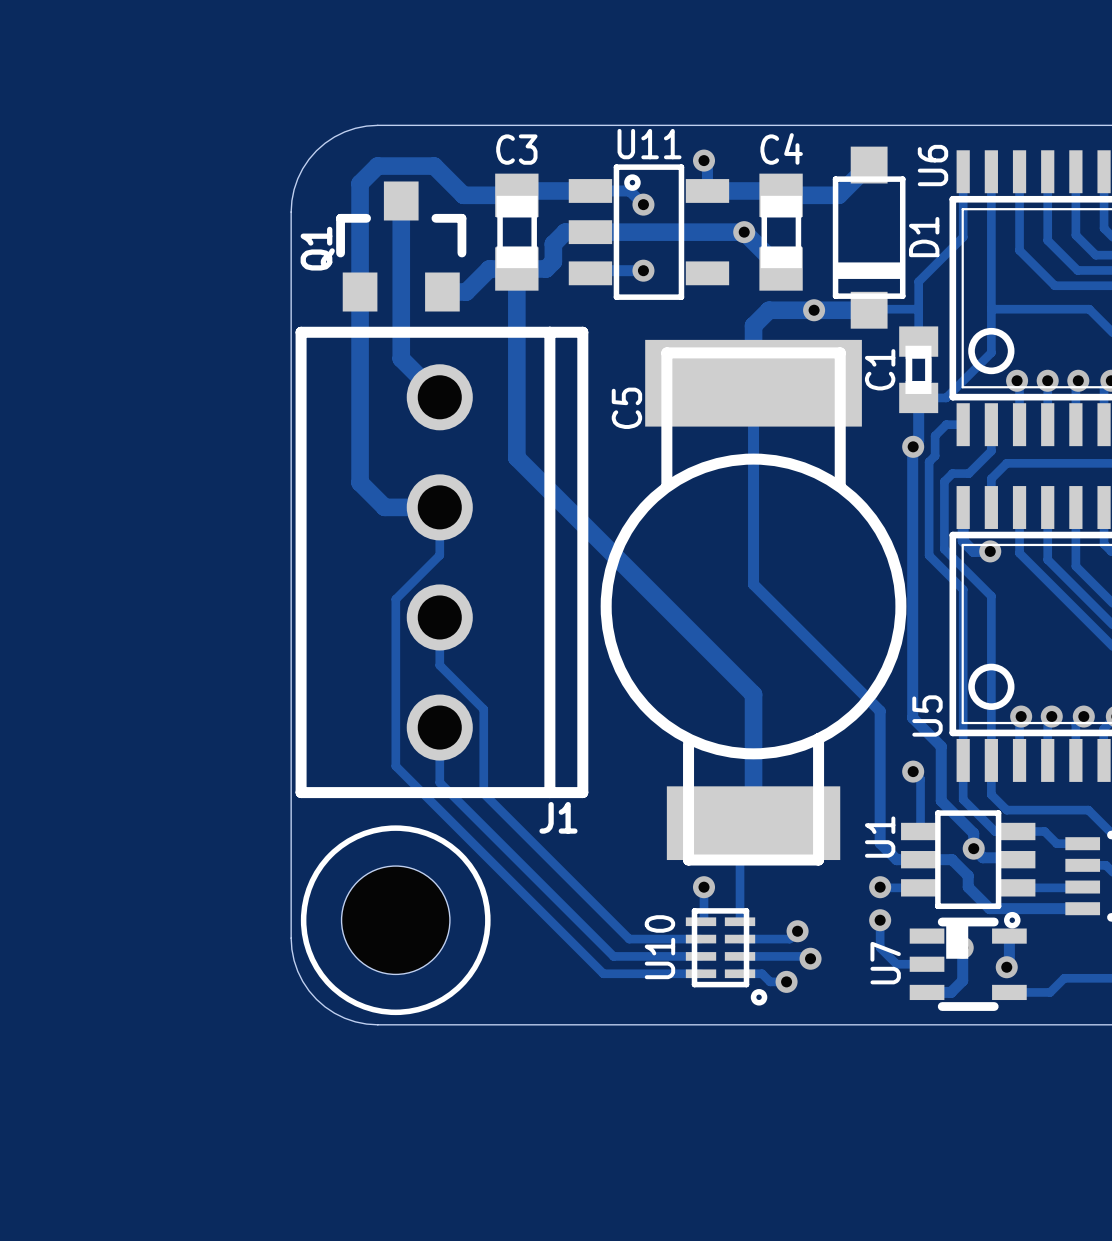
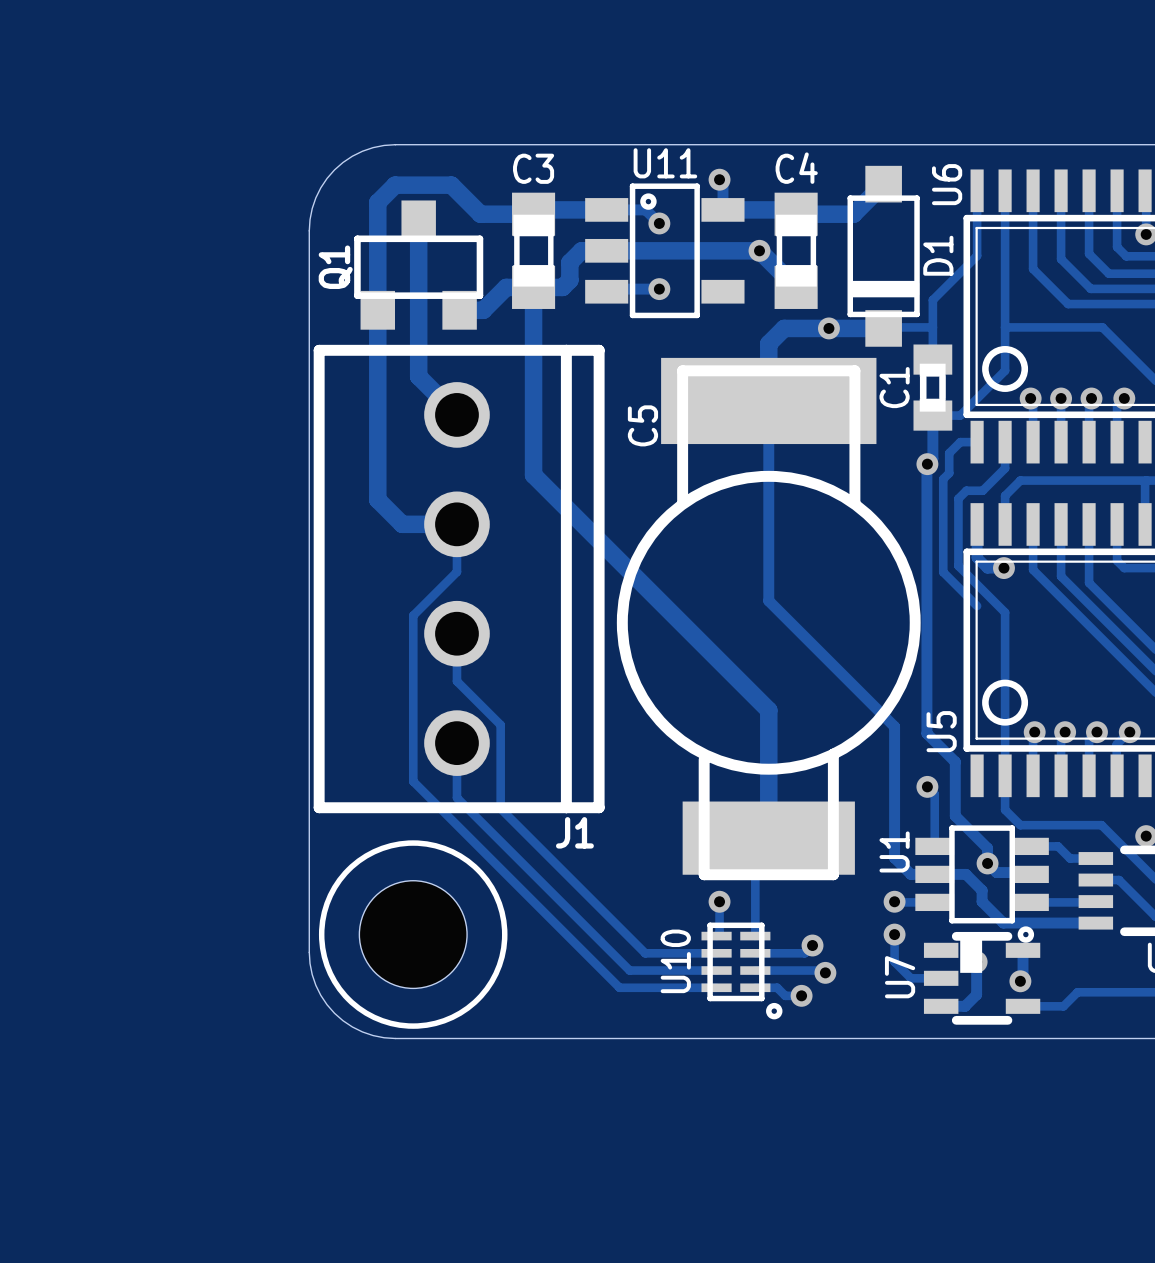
Q1 footprint: [336, 181, 467, 312] -> [354, 200, 484, 330]
track: (963, 589) (963, 799) (995, 831) (1015, 831) -> none

